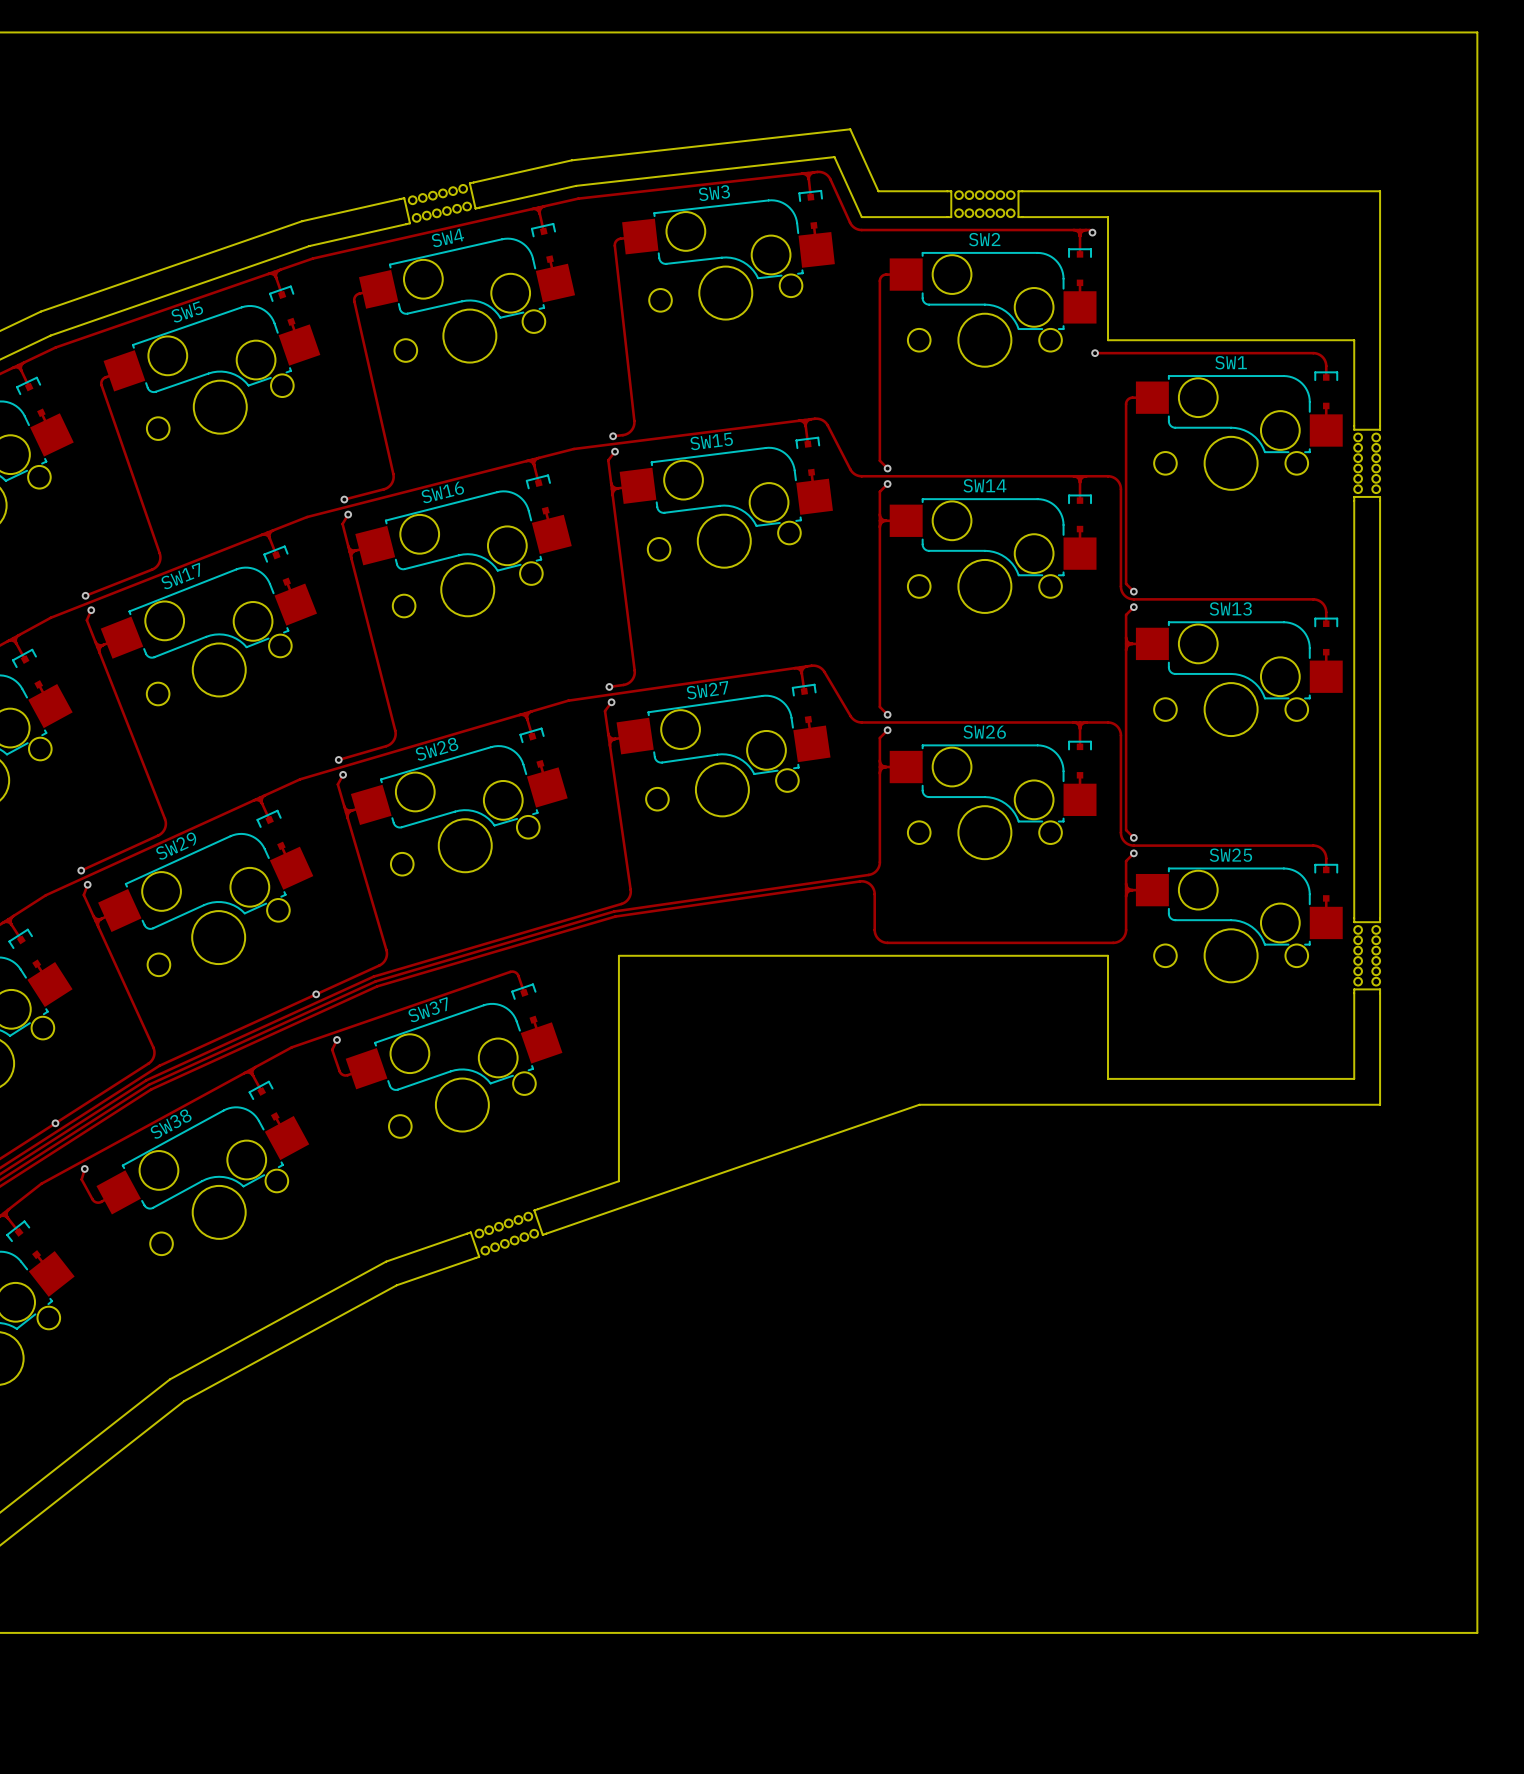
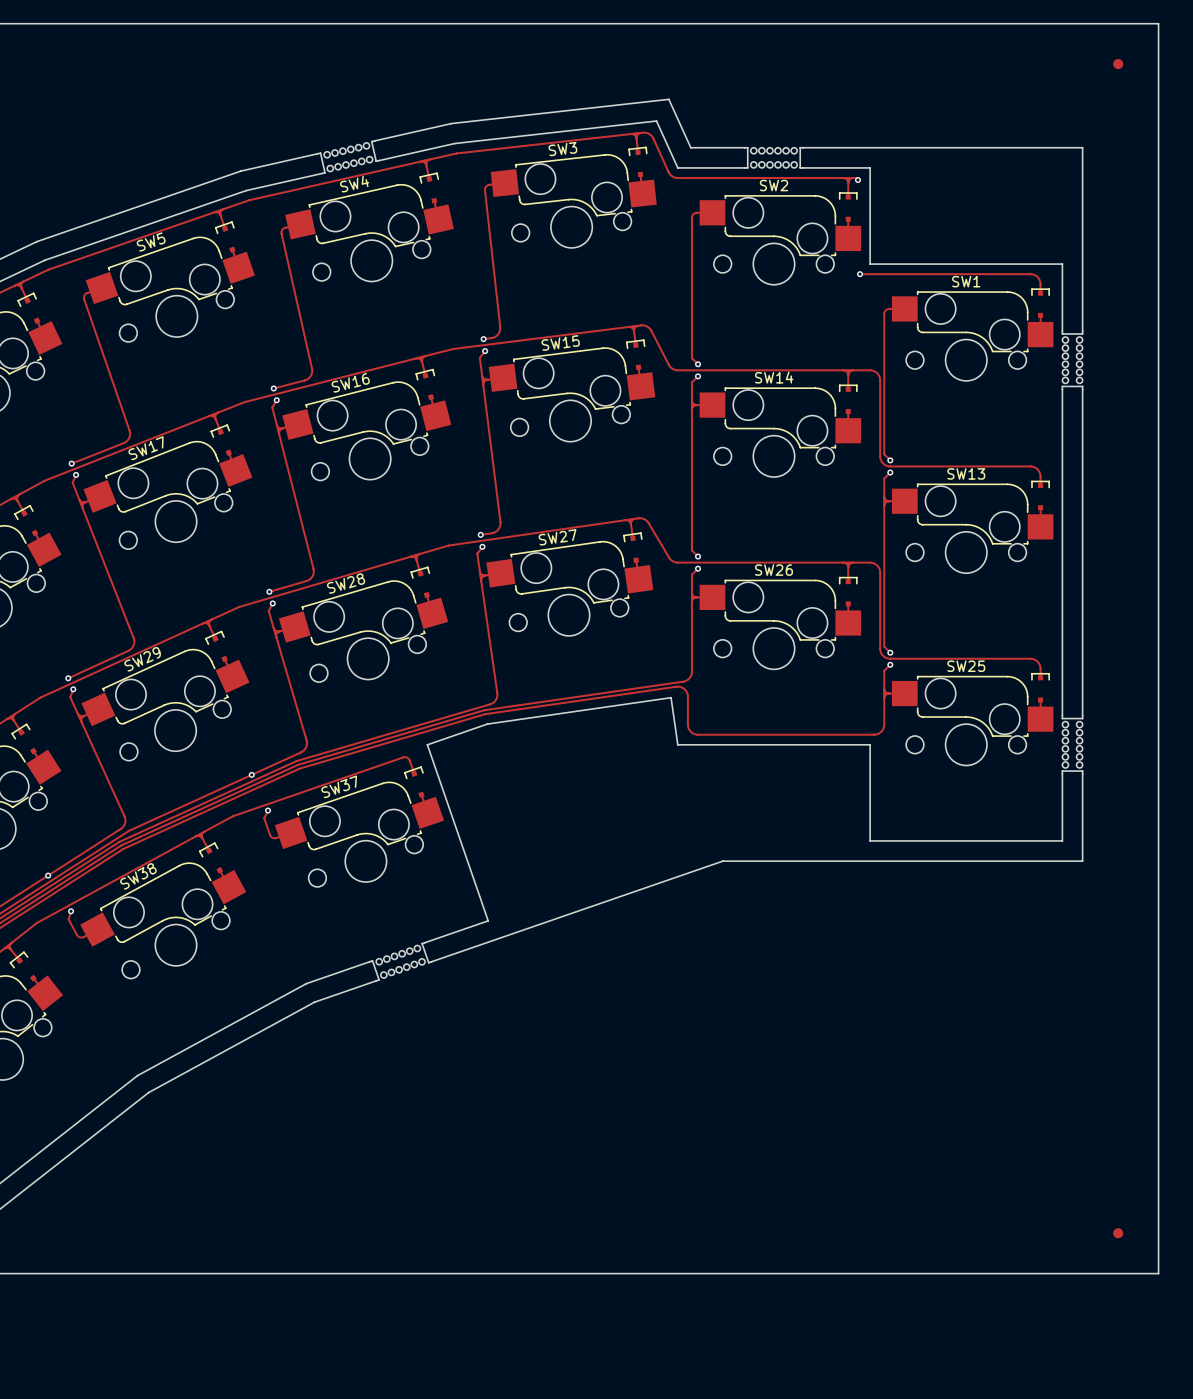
part: none -> (1118, 64)
board edge: (1108, 955) (618, 955) (618, 1181) -> (870, 744) (677, 744) (671, 697) (487, 724) (427, 744) (488, 920)
part: none -> (1118, 1233)

